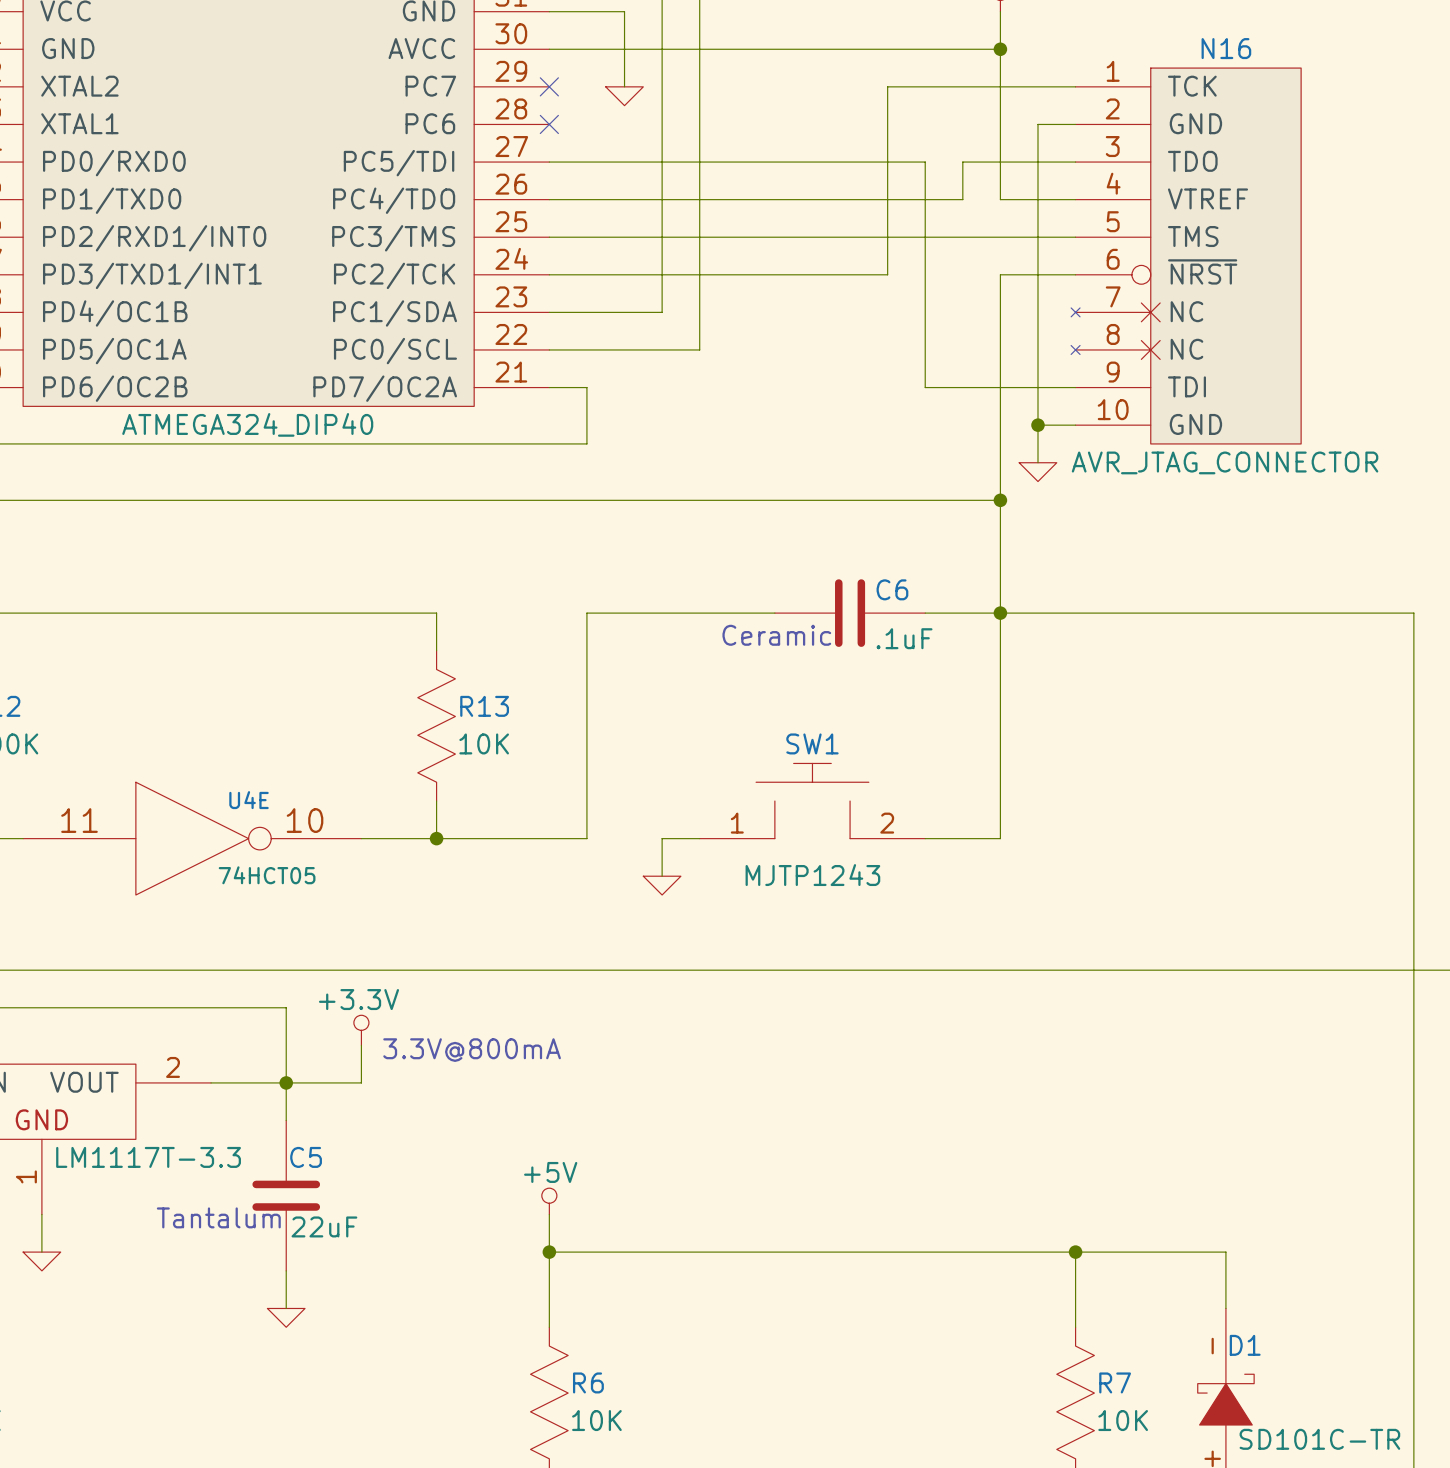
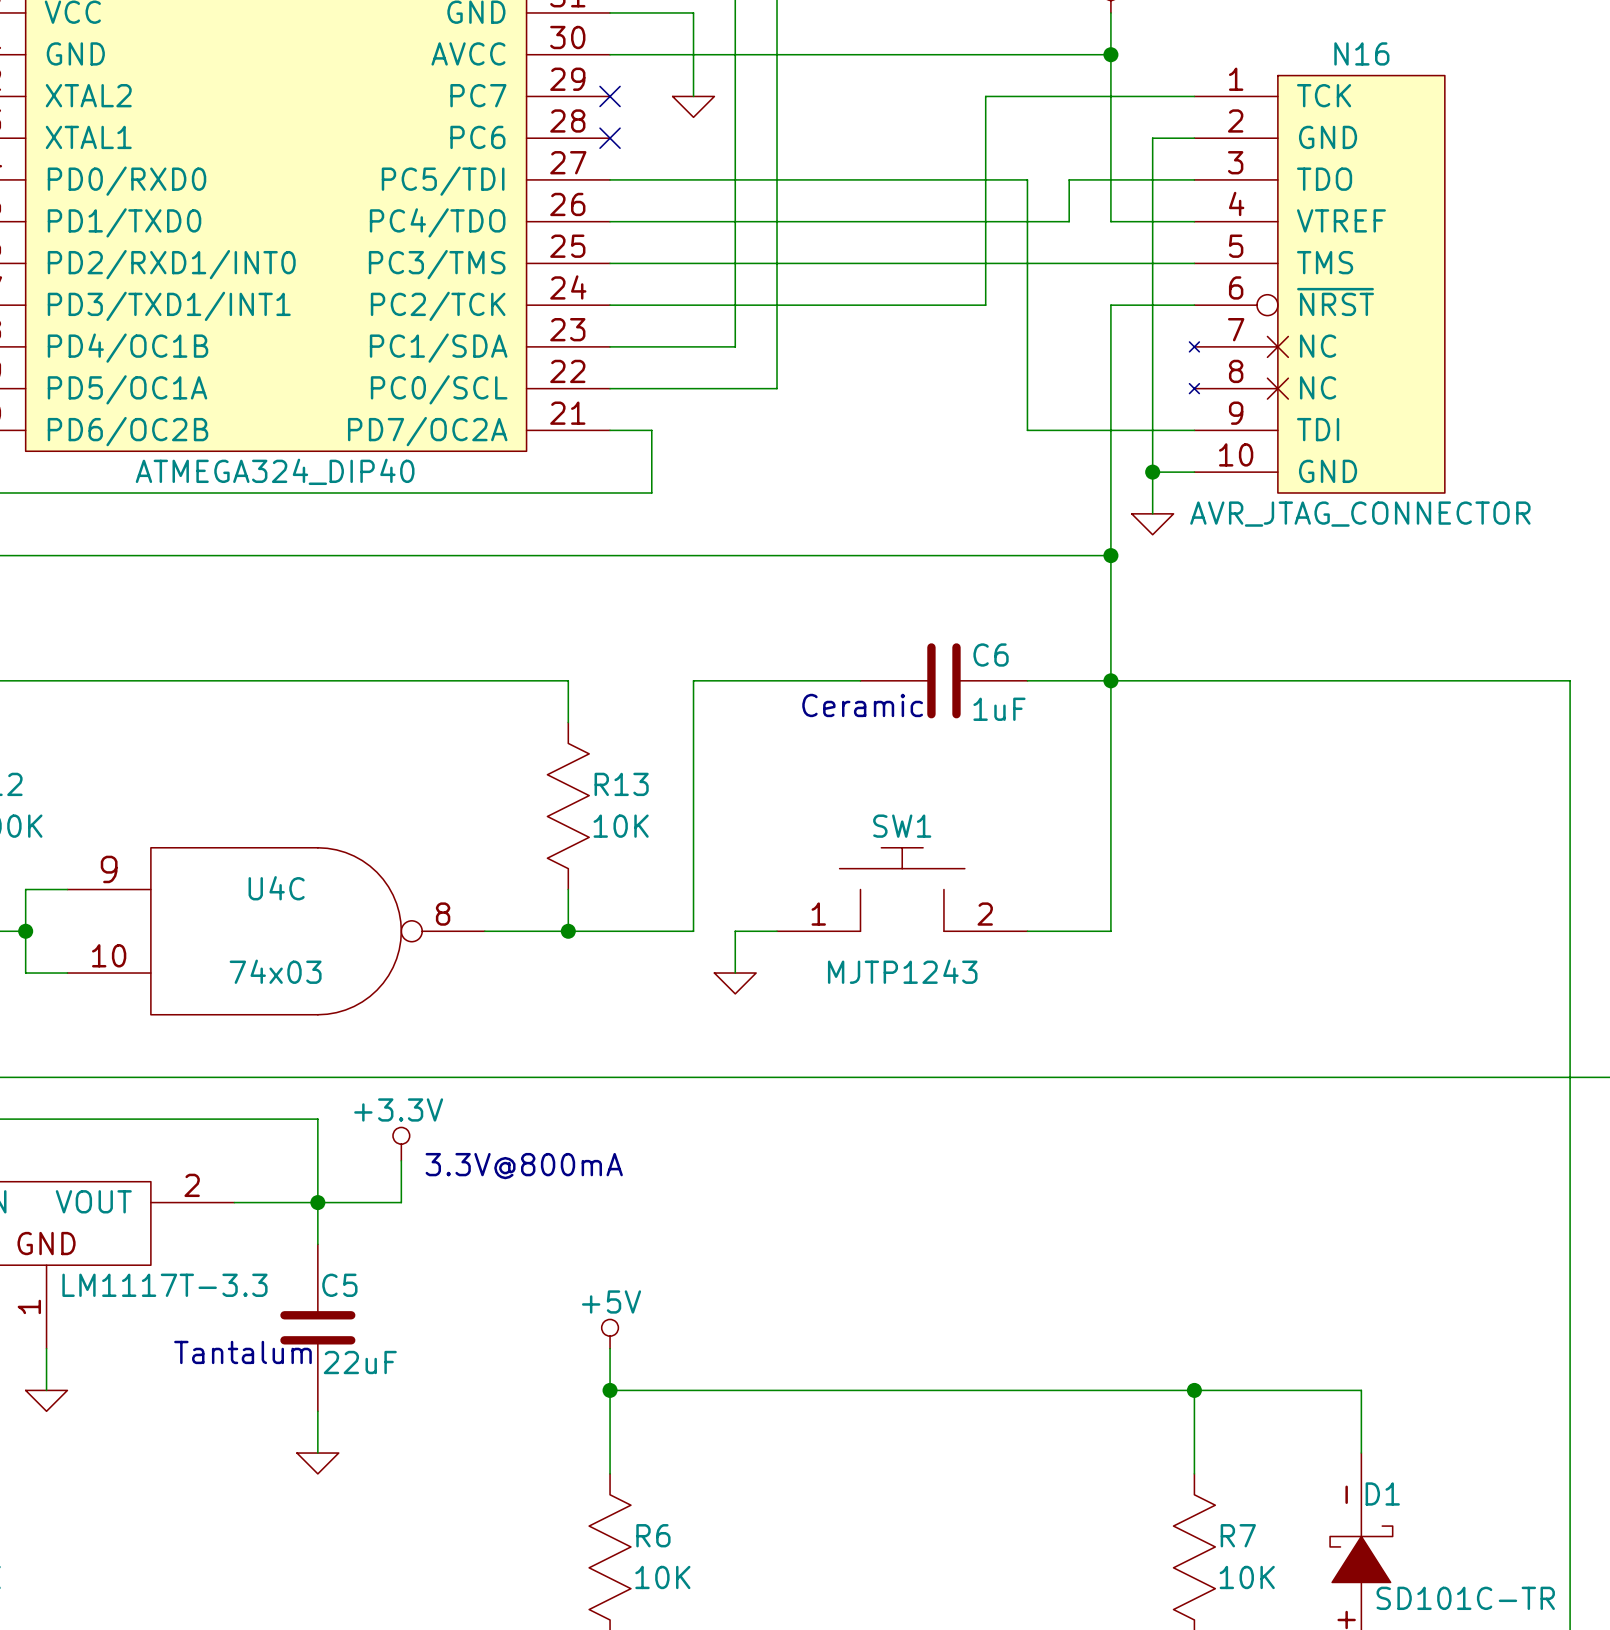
wire: (436, 613) (436, 650) -> (484, 680) (568, 680) (568, 722)
wire: (624, 613) (586, 613) (586, 838) -> (693, 680) (693, 931) (651, 931)
C6 value: .1uF (904, 638) -> 1uF (999, 709)
R13 position: (436, 725) -> (568, 806)
wire: none -> (67, 889) (25, 889) (25, 973) (67, 973)
wire: (436, 801) (436, 838) (361, 838) -> none
wire: none -> (568, 889) (568, 931)
junction: none -> (25, 931)
U4E: 74HCT05 (192, 838) -> none
U4C: none -> 74x03 (276, 931)
junction position: (436, 838) -> (568, 931)

